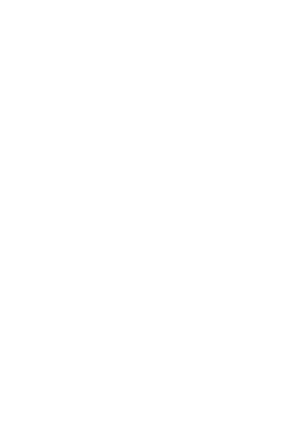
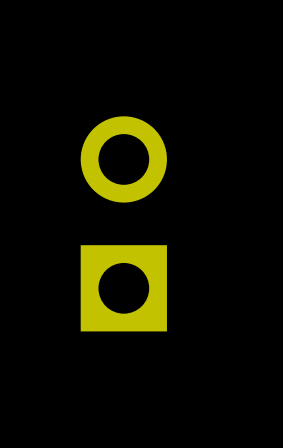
part: none -> (123, 223)

